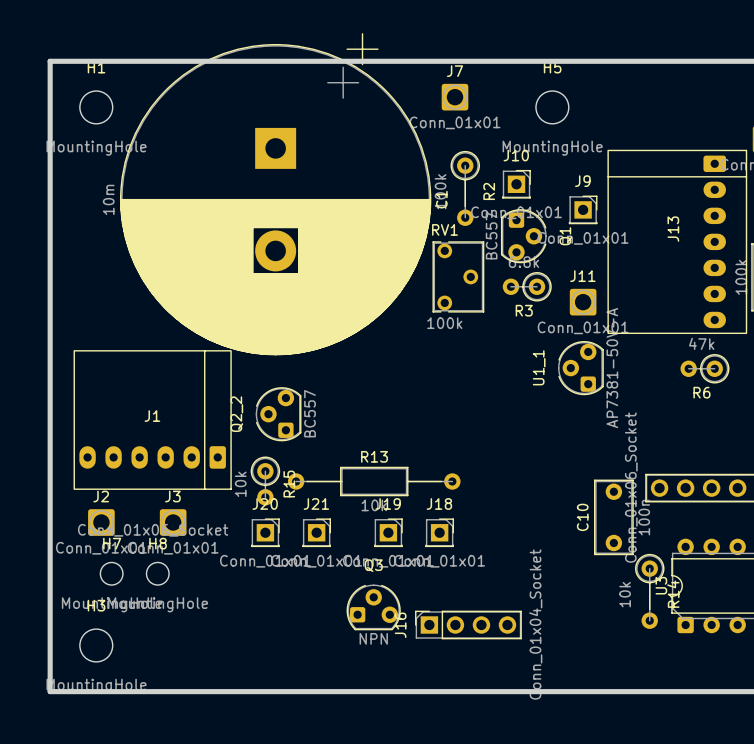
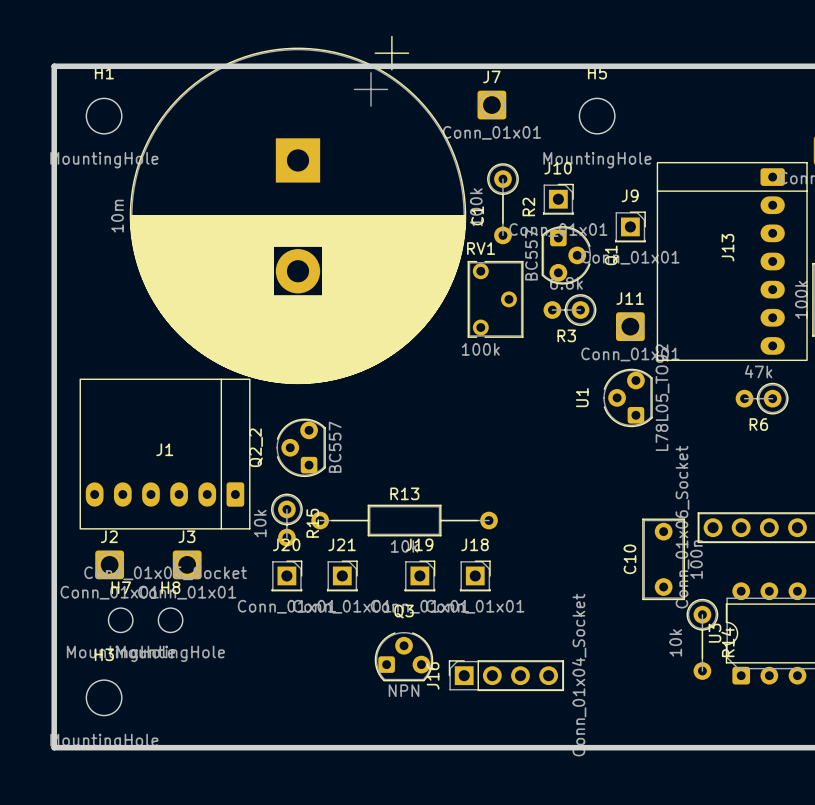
U1_1 name: U1_1 (539, 367) -> U1 (582, 397)
U1_1 value: AP7381-50V-A (612, 368) -> L78L05_TO92 (662, 397)

